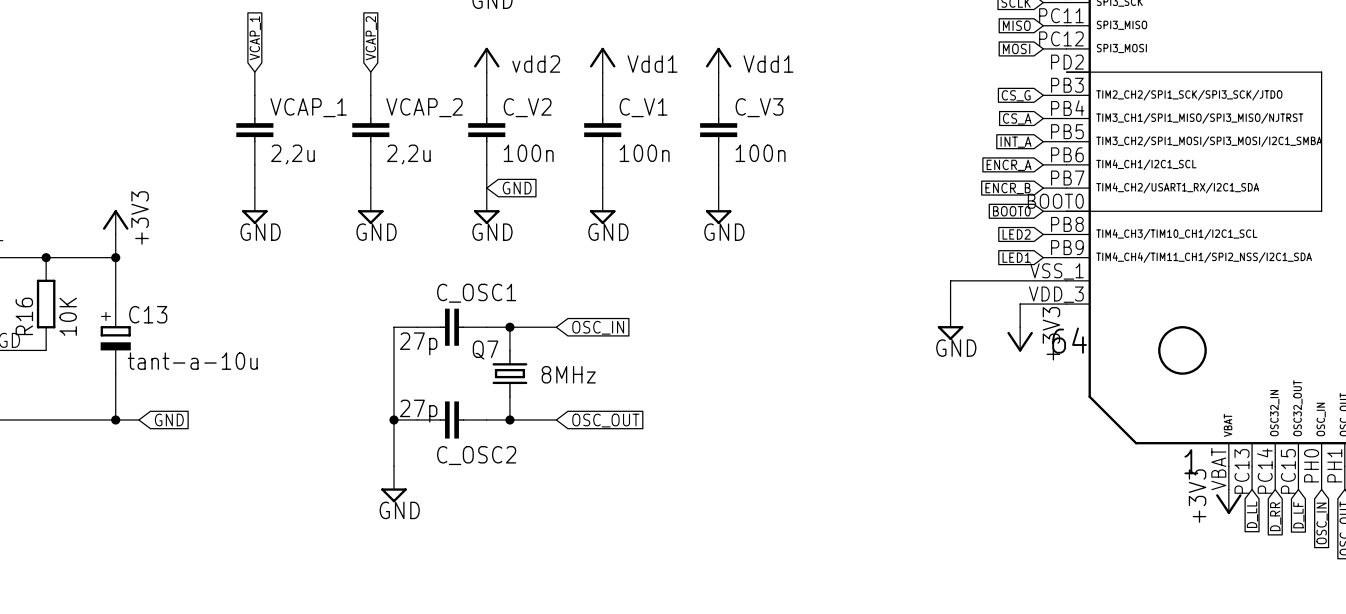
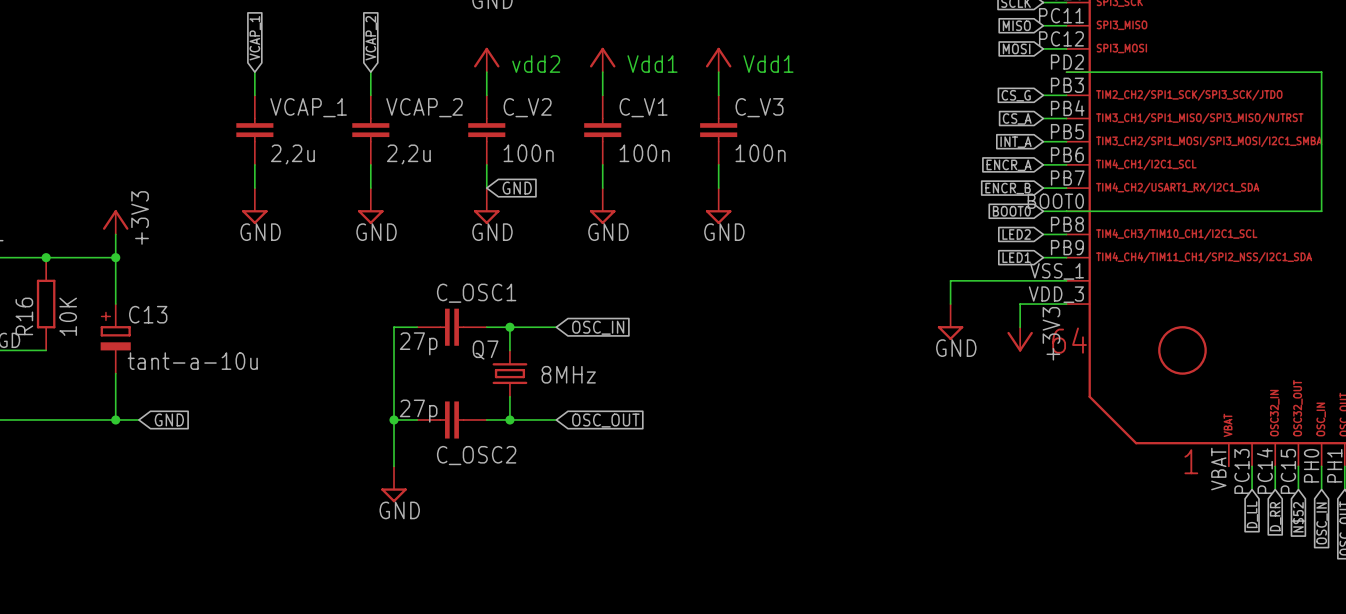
wire: (1228, 466) (1228, 489) -> none
power symbol: +3V3 (1228, 501) -> none
global label: D_LF (1298, 515) -> N$52 (1298, 517)

